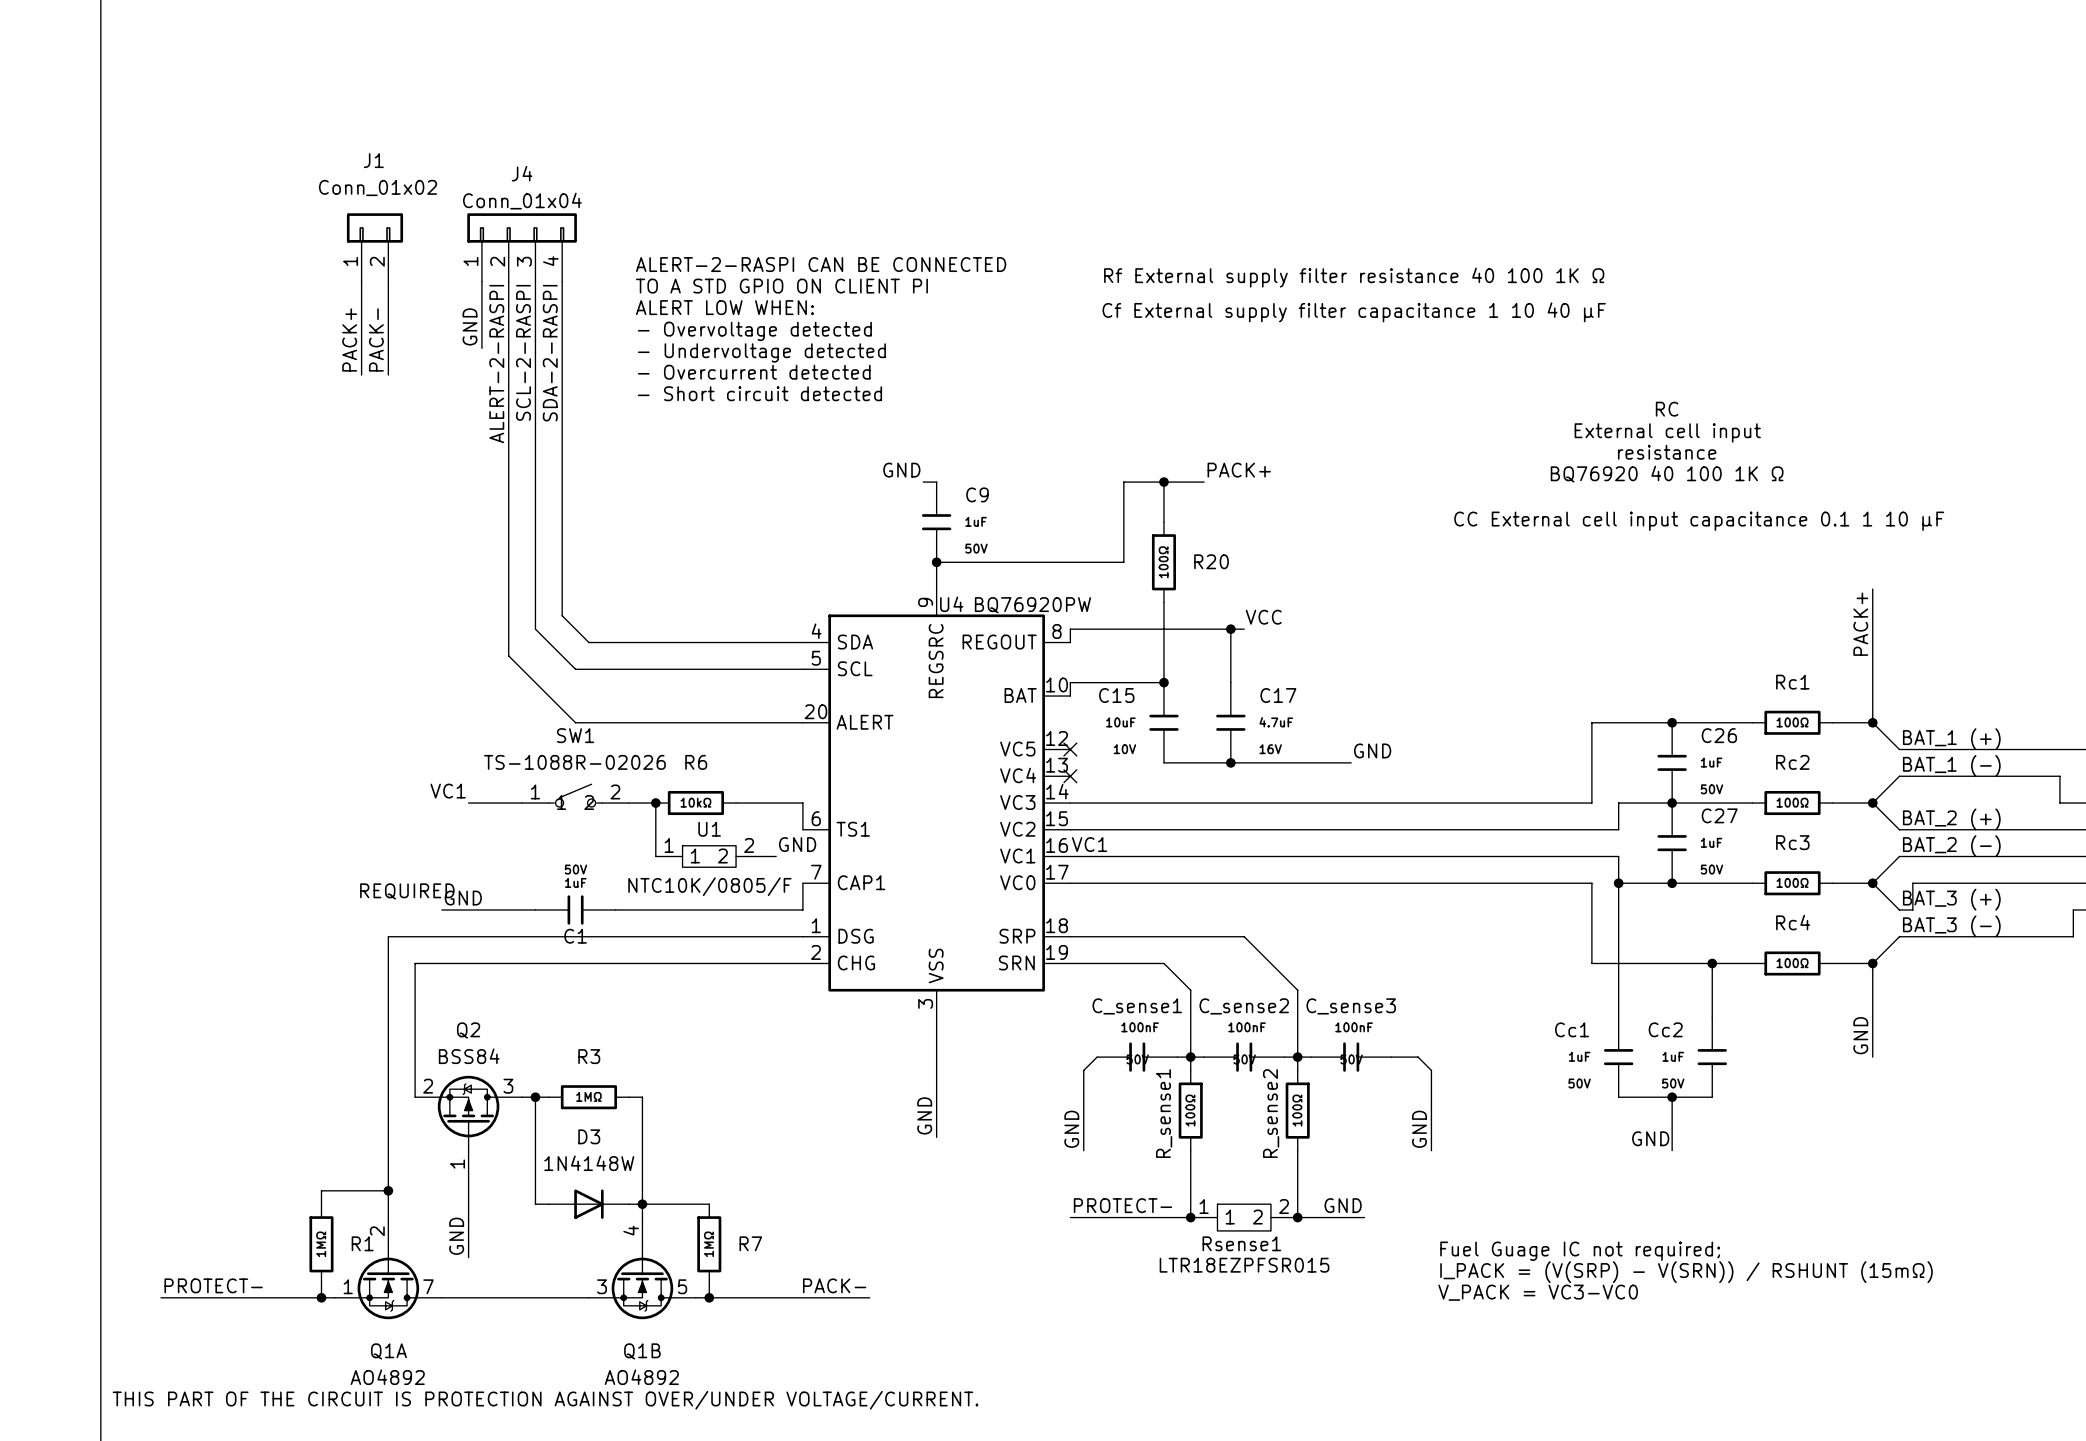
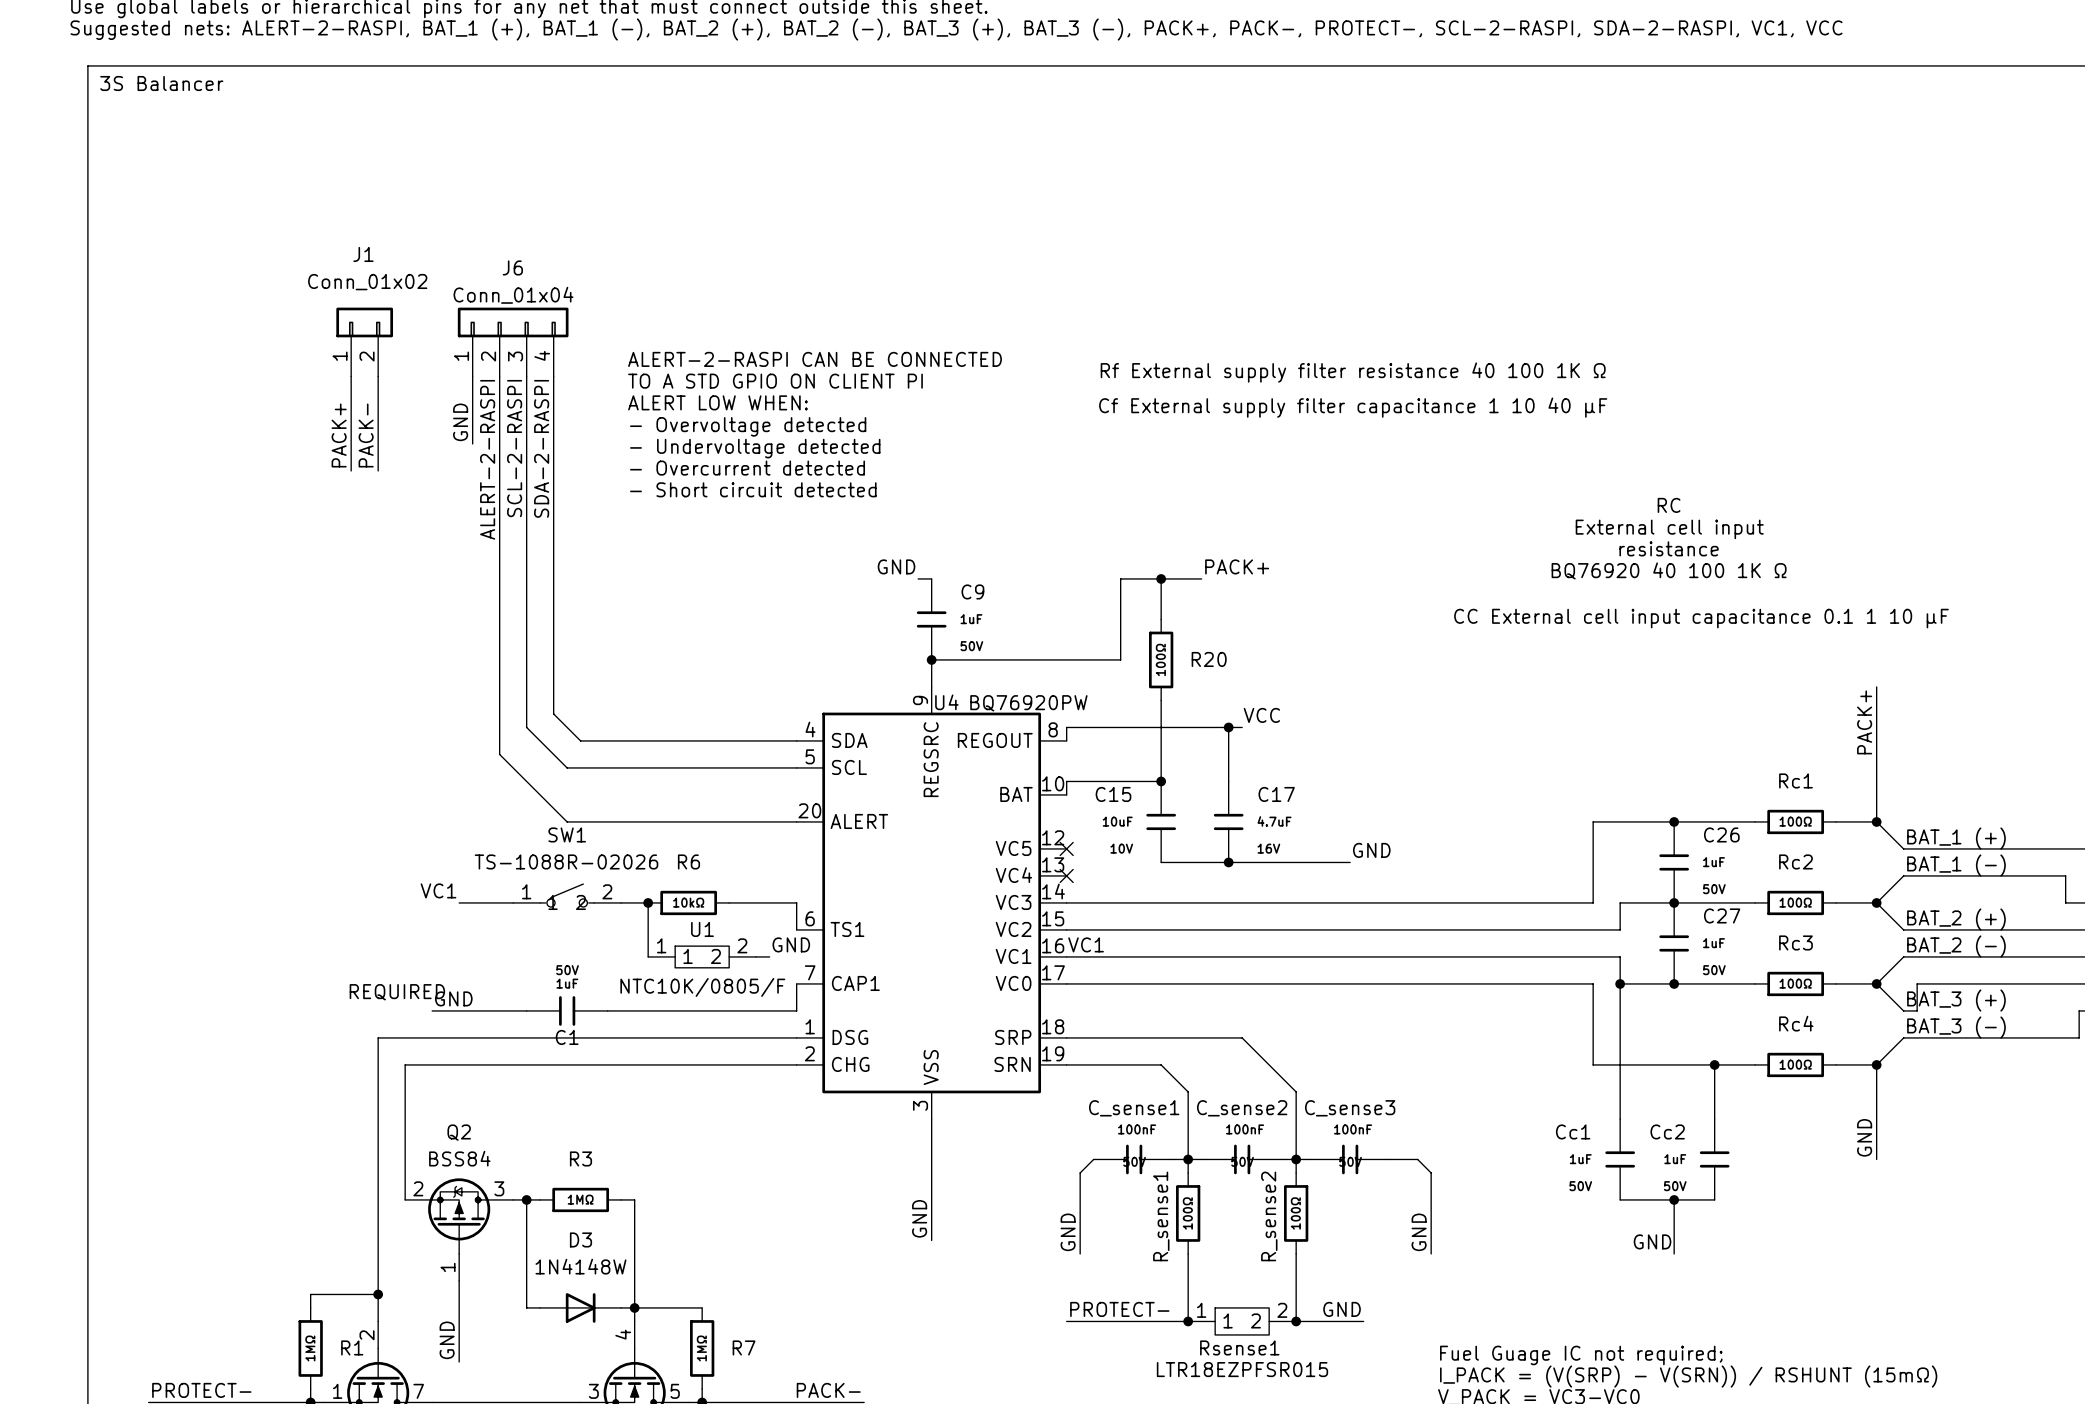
J4 name: J4 (522, 173) -> J6 (512, 267)

